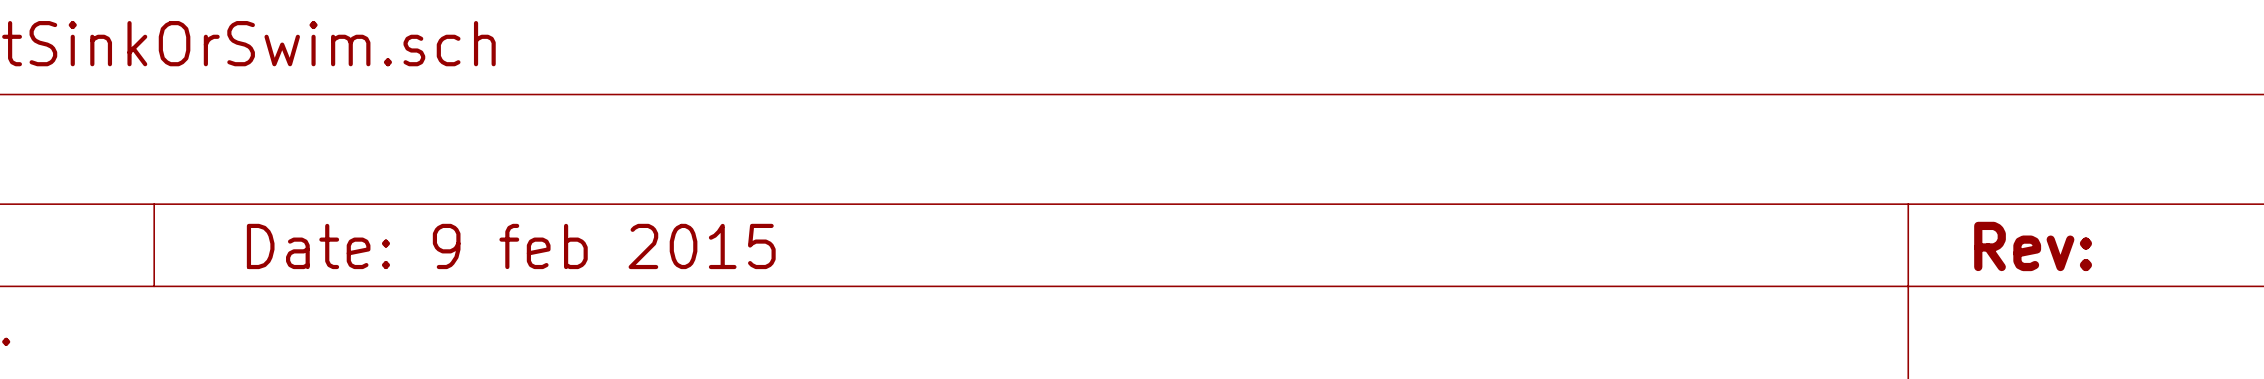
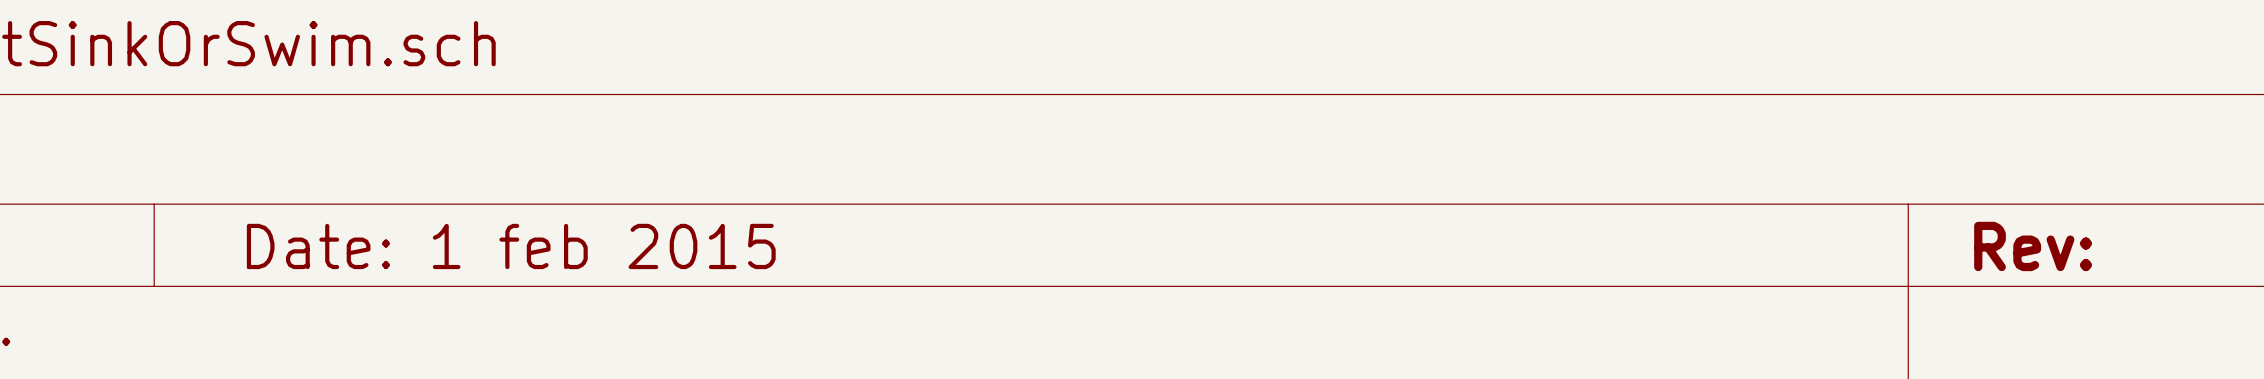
title block: Date: 9 feb 2015 (511, 246) -> Date: 1 feb 2015 (511, 246)

